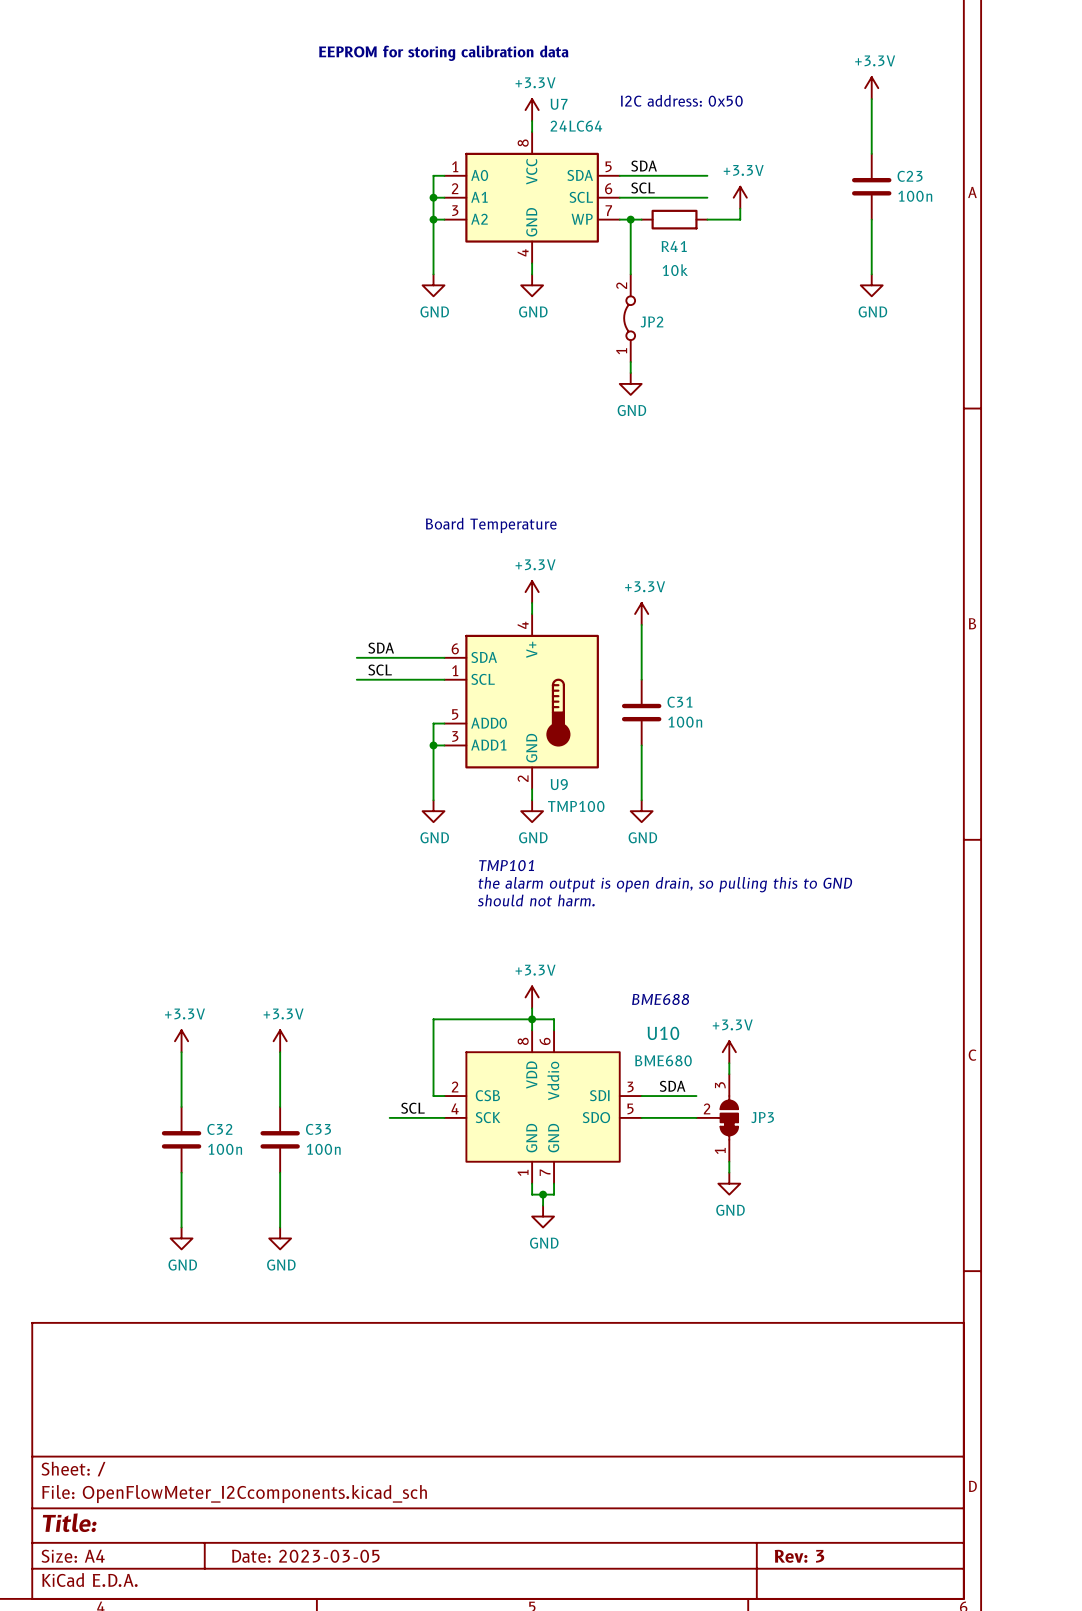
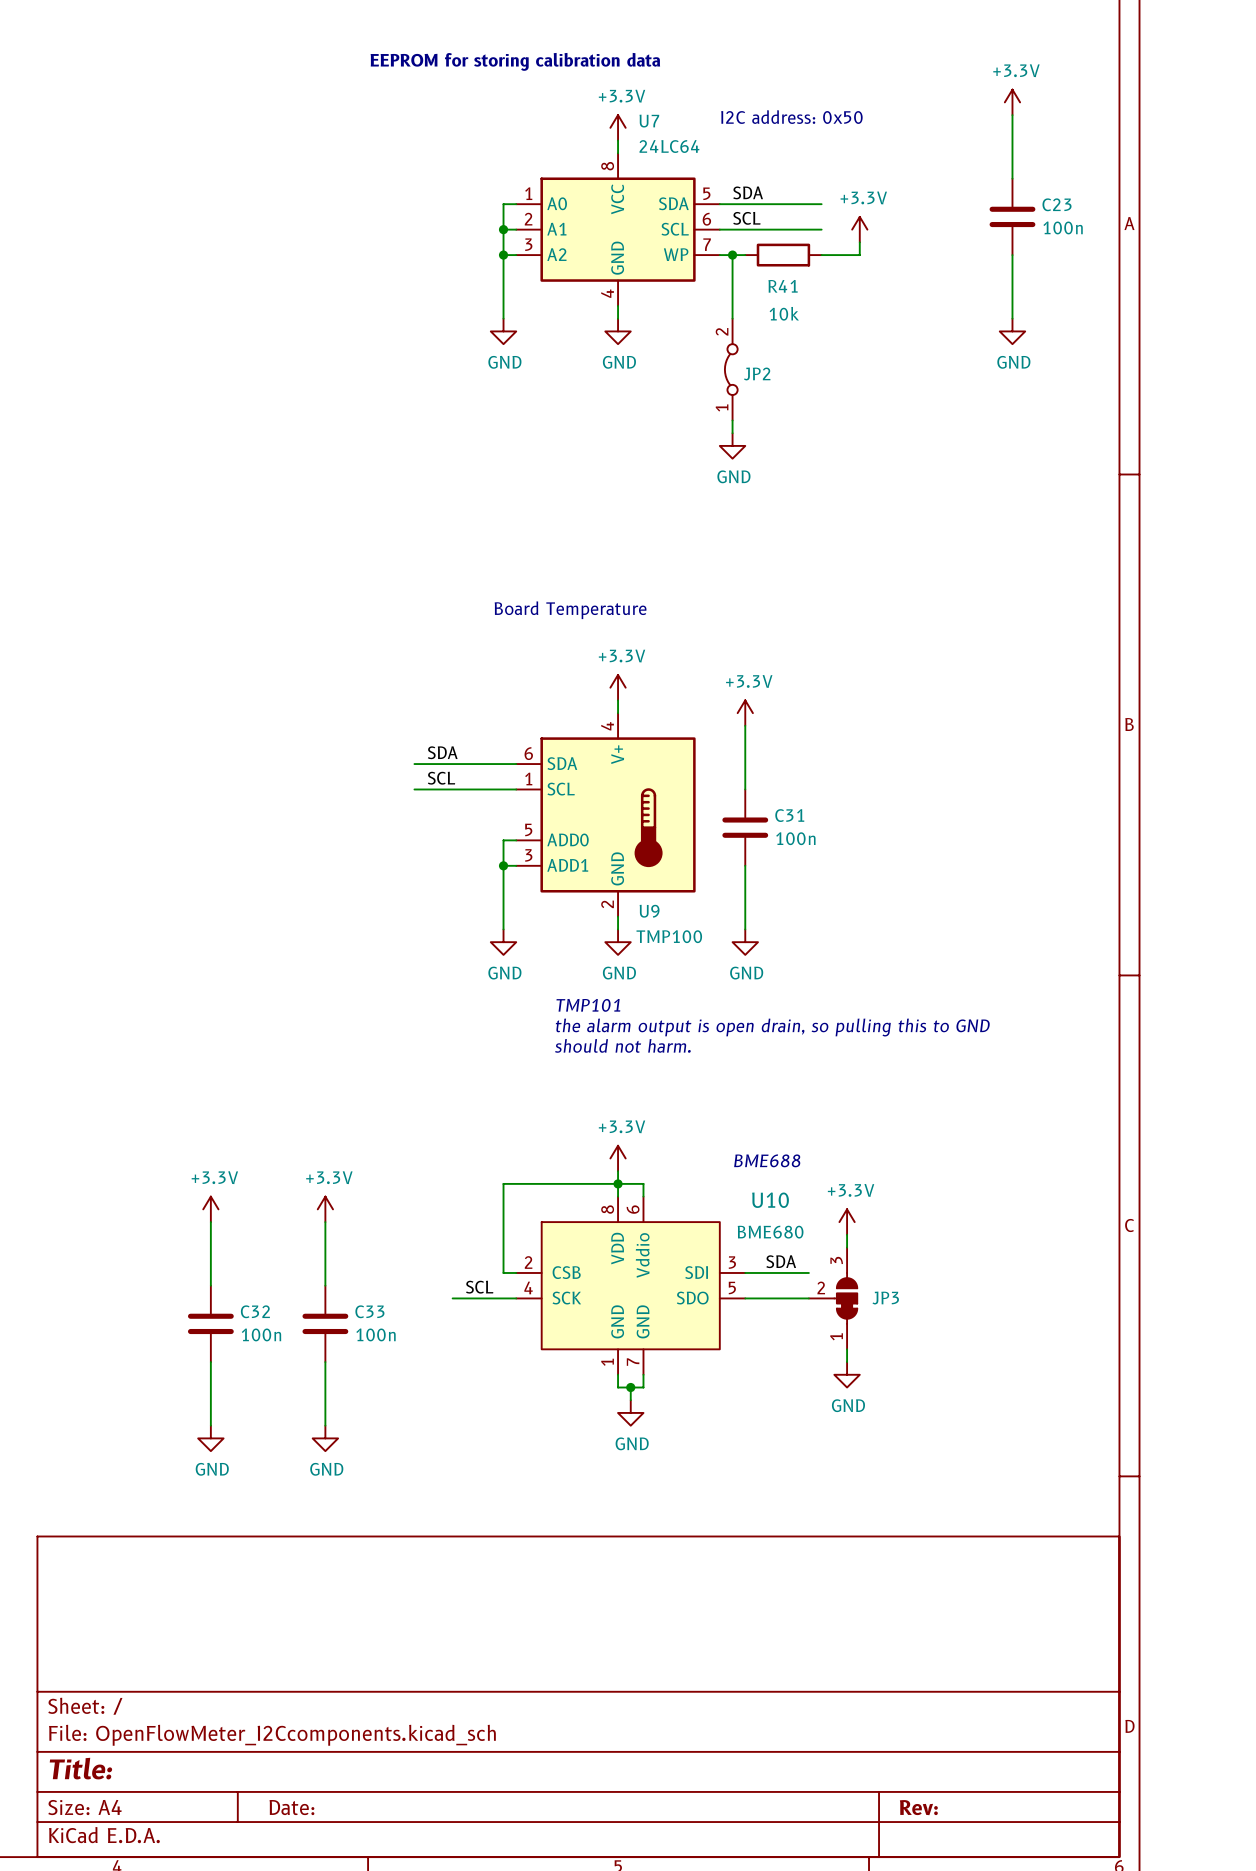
title block: Date: 2023-03-05 (305, 1556) -> Date: (291, 1807)
title block: Rev: 3 (799, 1556) -> Rev: (918, 1807)

